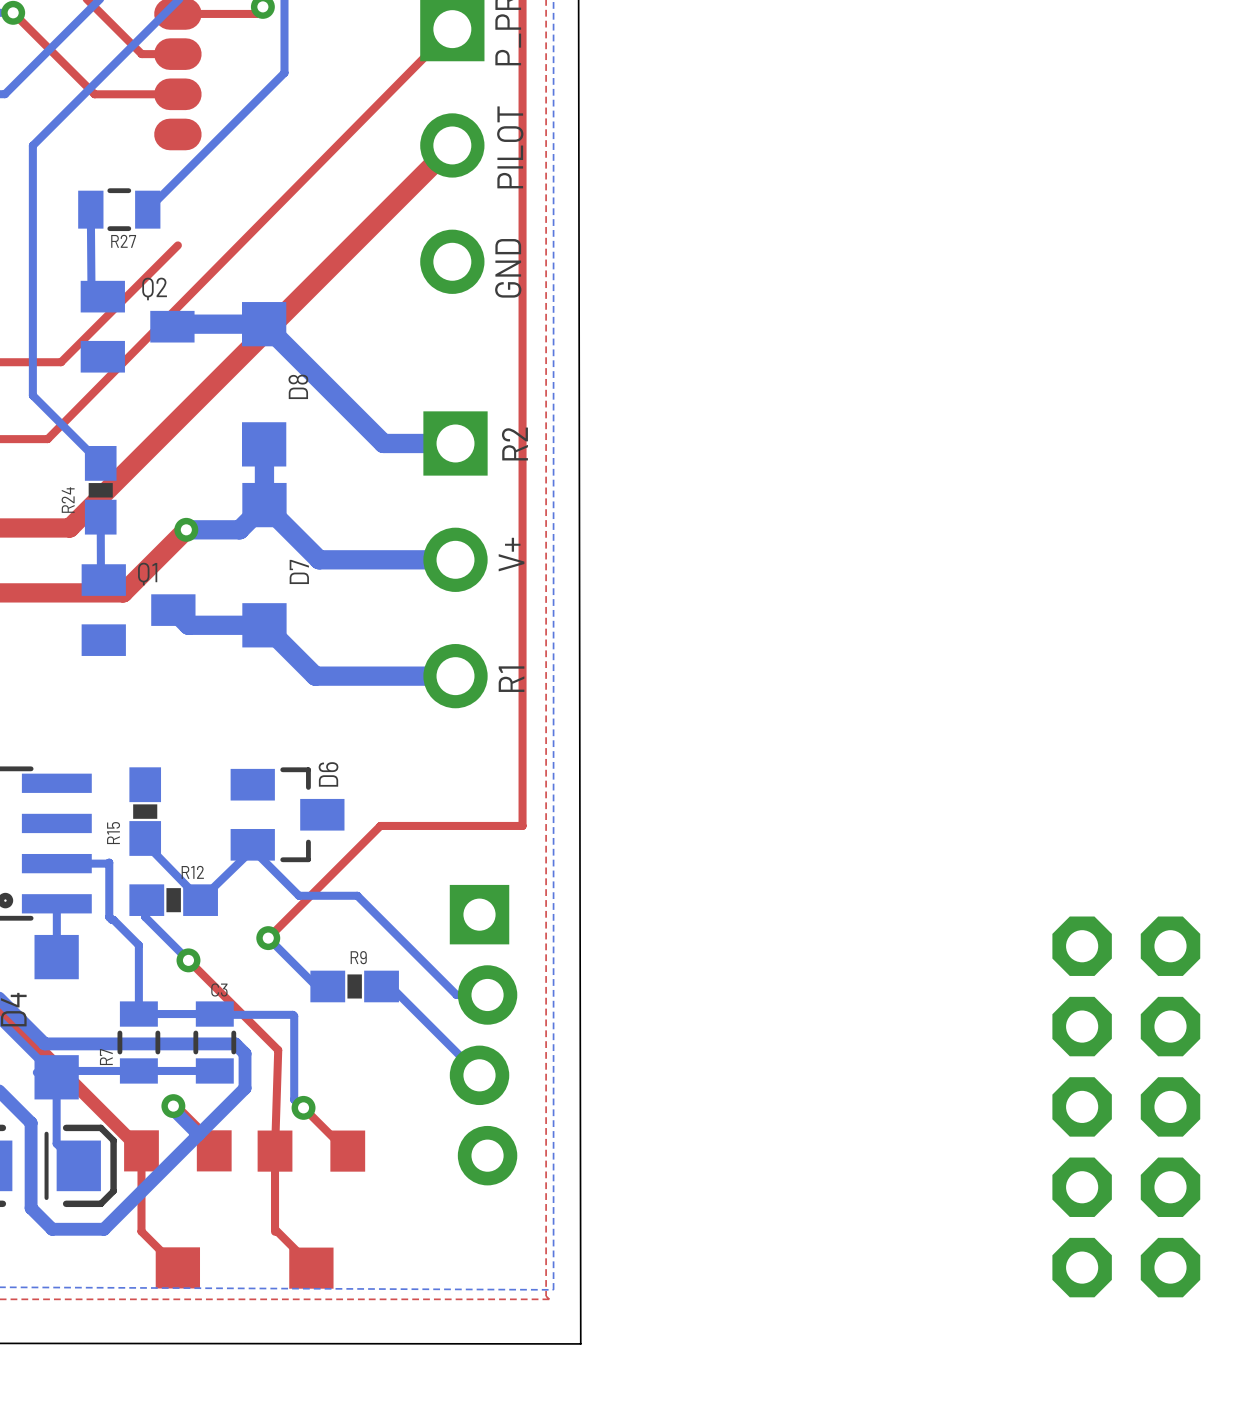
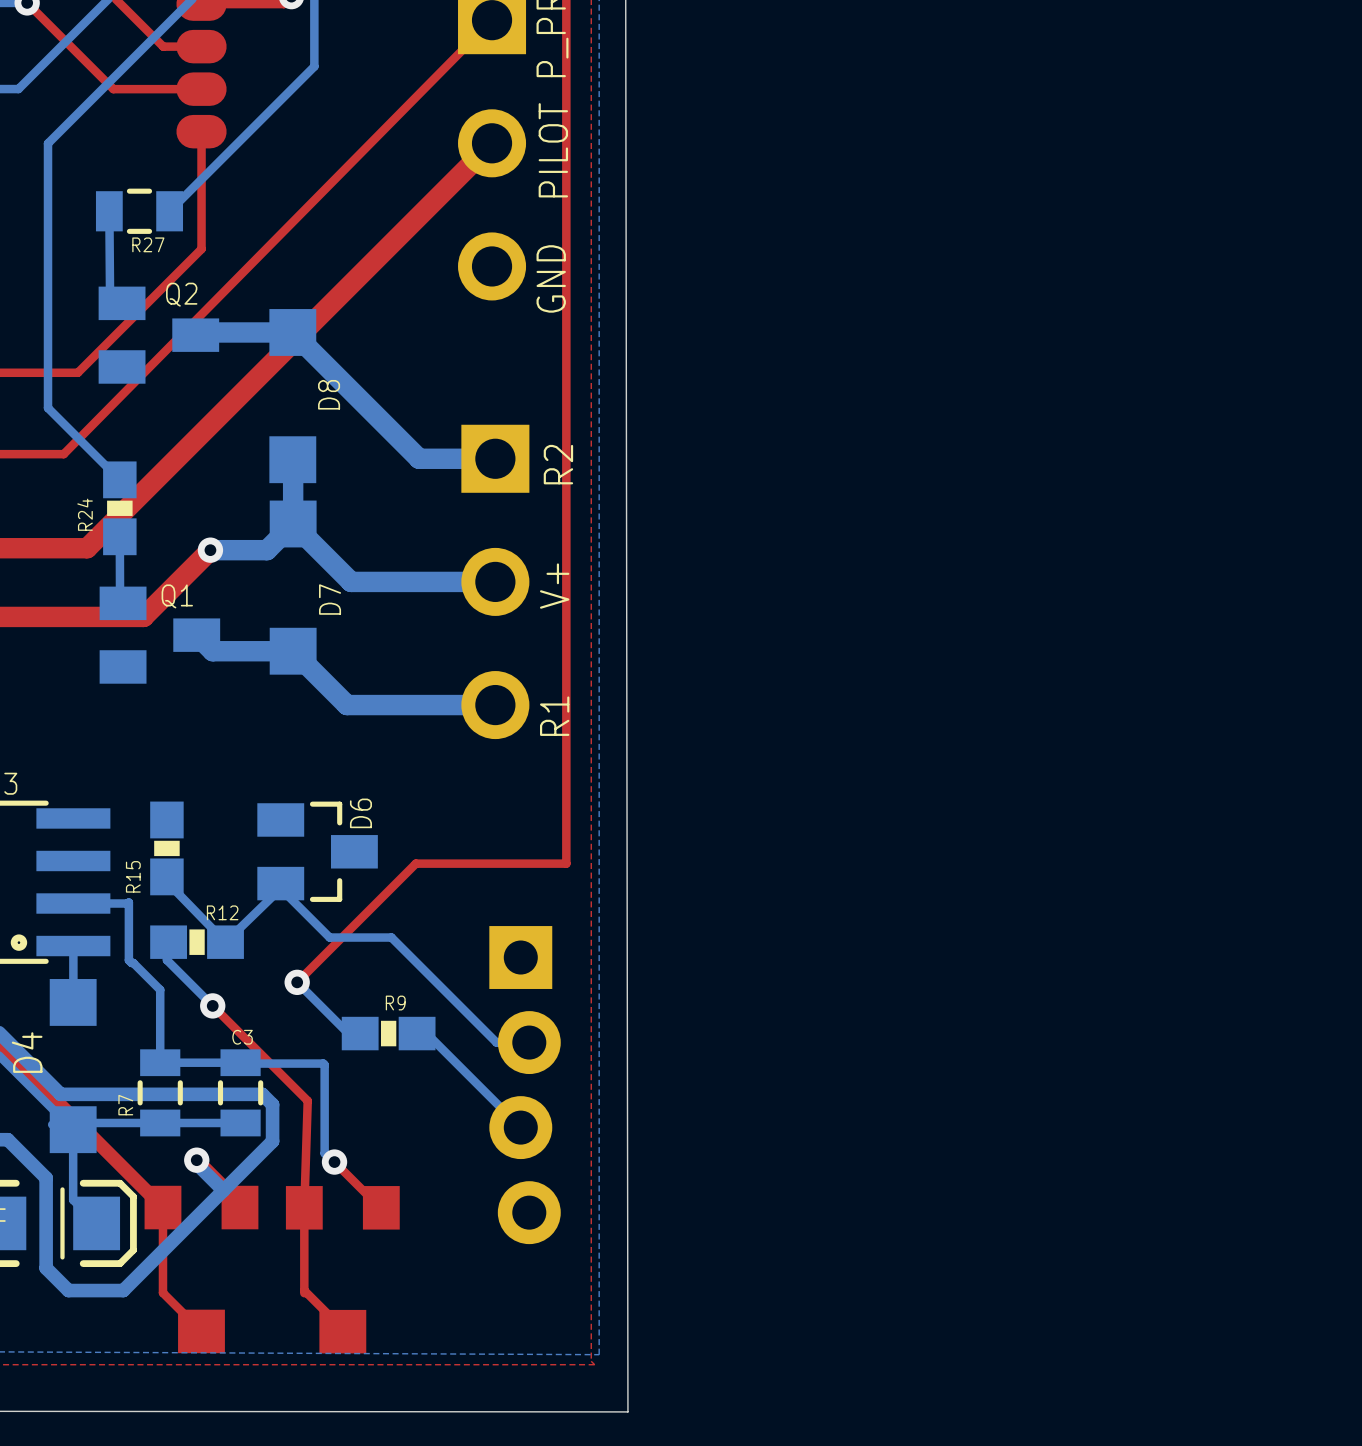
top track: none -> (201, 131) (201, 249)
part: (1126, 1106) -> none

